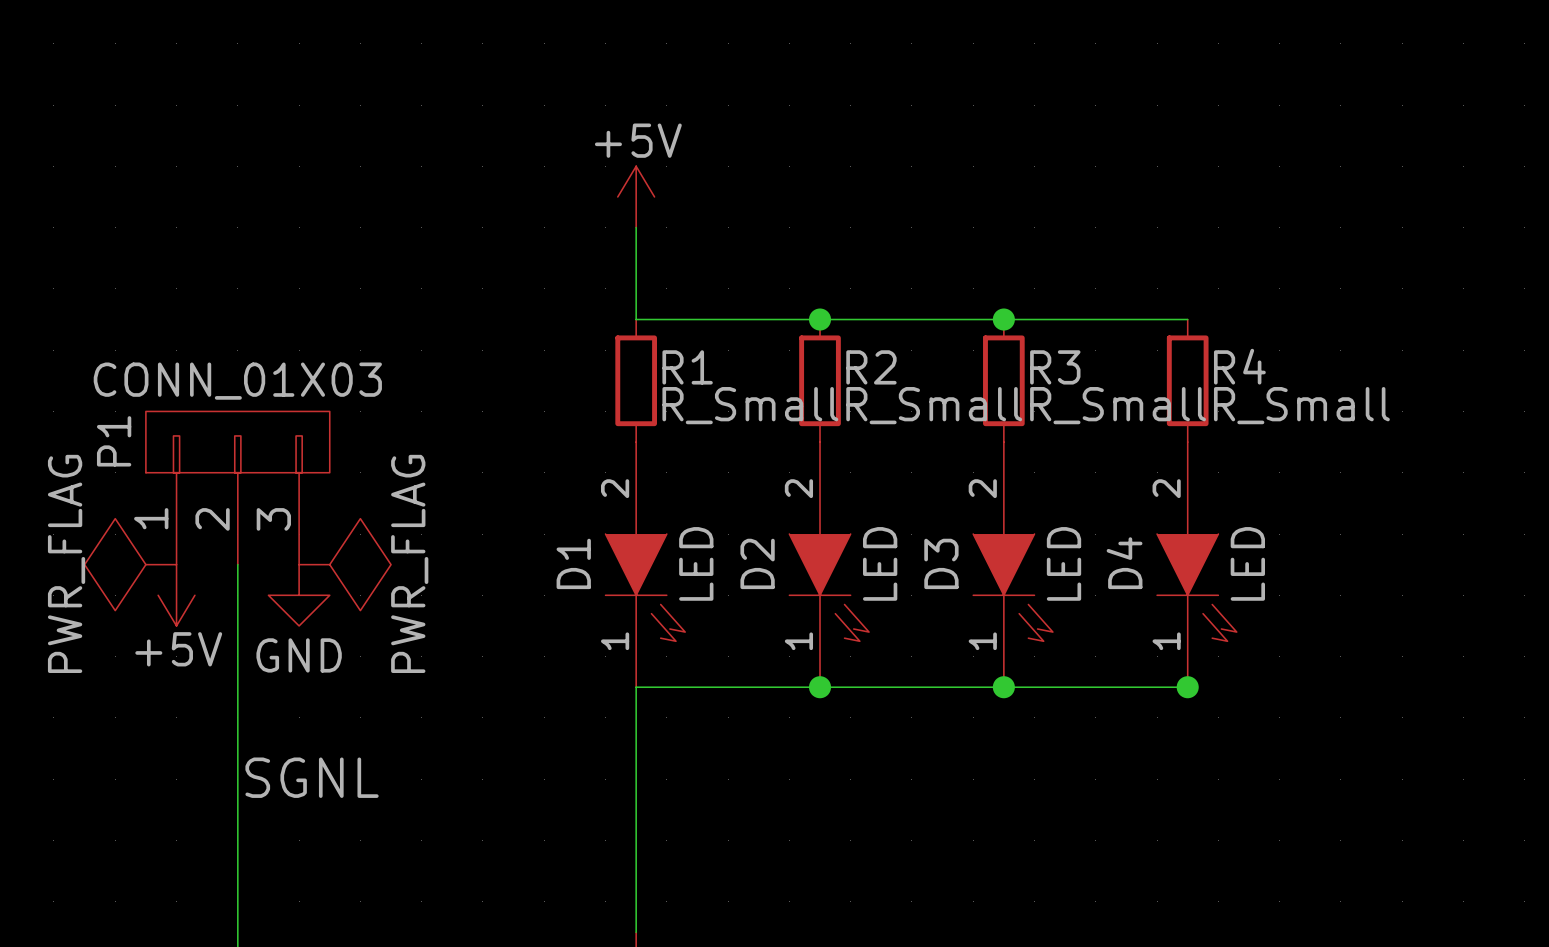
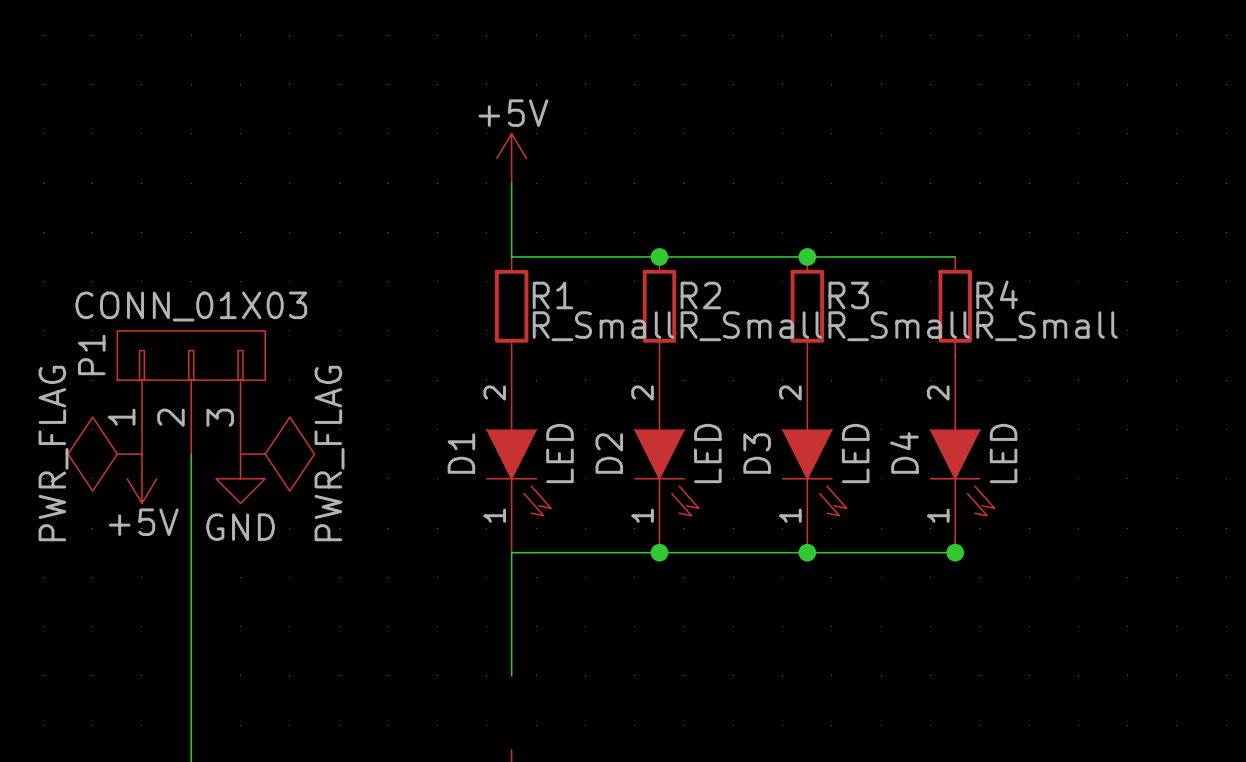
label: SGNL (312, 777) -> none
wire: (636, 840) (636, 932) -> none

